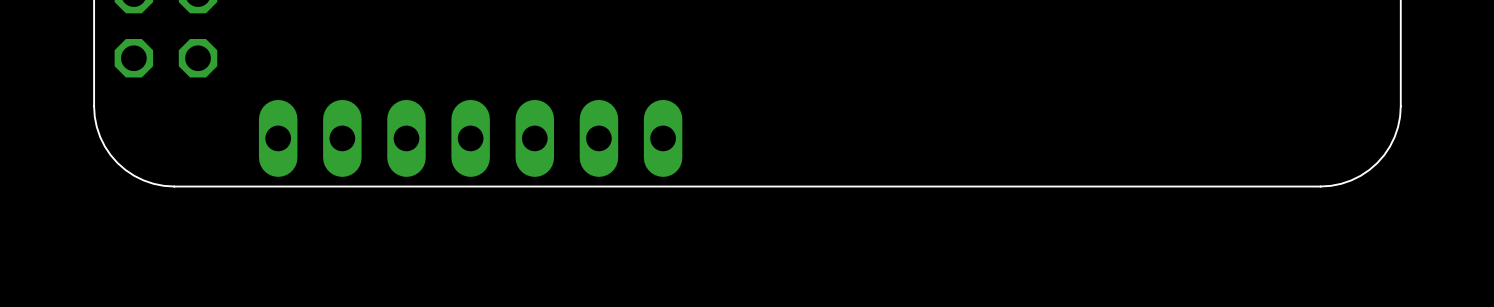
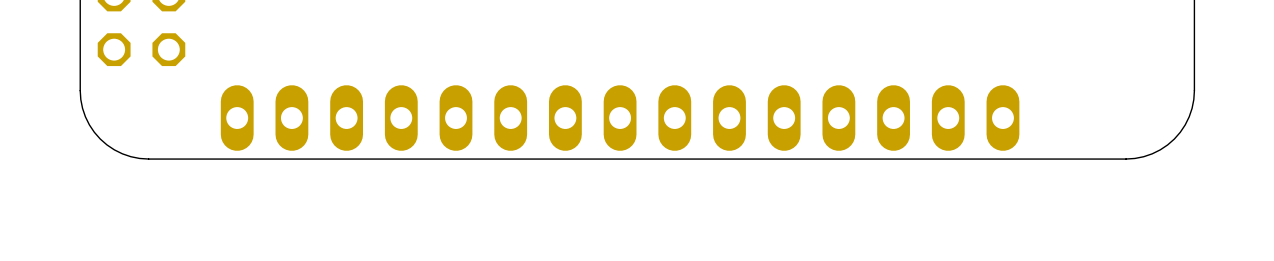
part: none -> (811, 118)

